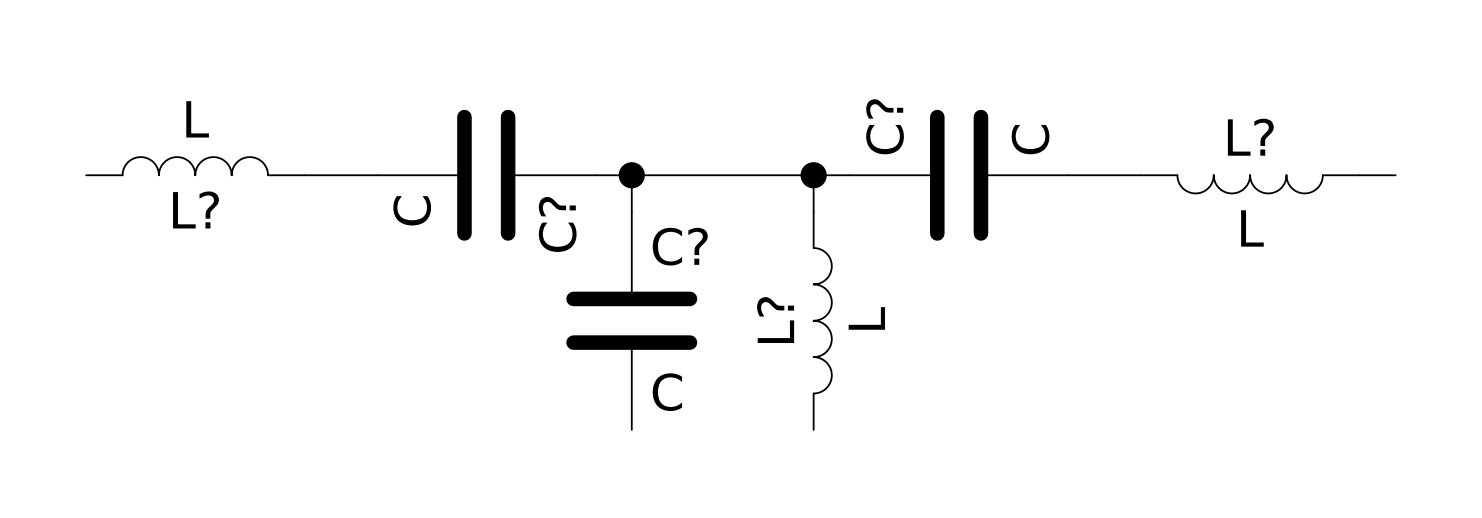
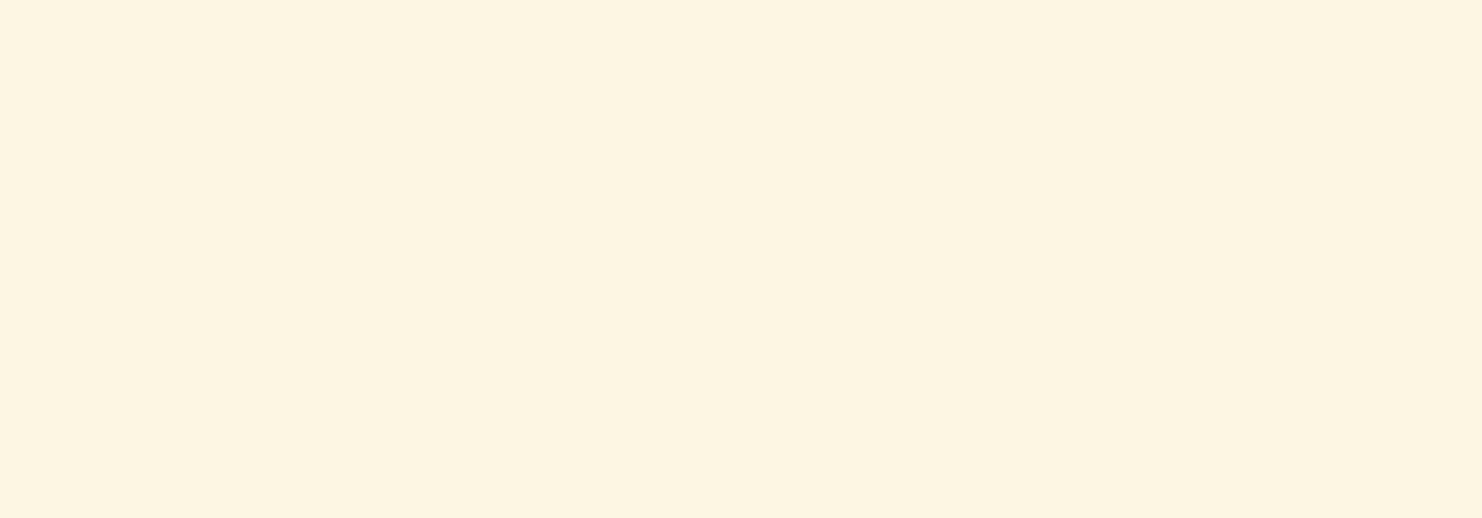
L?: L (195, 166) -> none
wire: (304, 175) (377, 175) -> none
C?: C (486, 175) -> none
wire: (595, 175) (850, 175) -> none
wire: (631, 175) (631, 211) -> none
junction: (631, 175) -> none
wire: (813, 175) (813, 211) -> none
junction: (813, 175) -> none
C?: C (959, 175) -> none
wire: (1068, 175) (1141, 175) -> none
wire: (1359, 175) (1395, 175) -> none
L?: L (1250, 184) -> none
C?: C (631, 320) -> none
L?: L (822, 320) -> none

